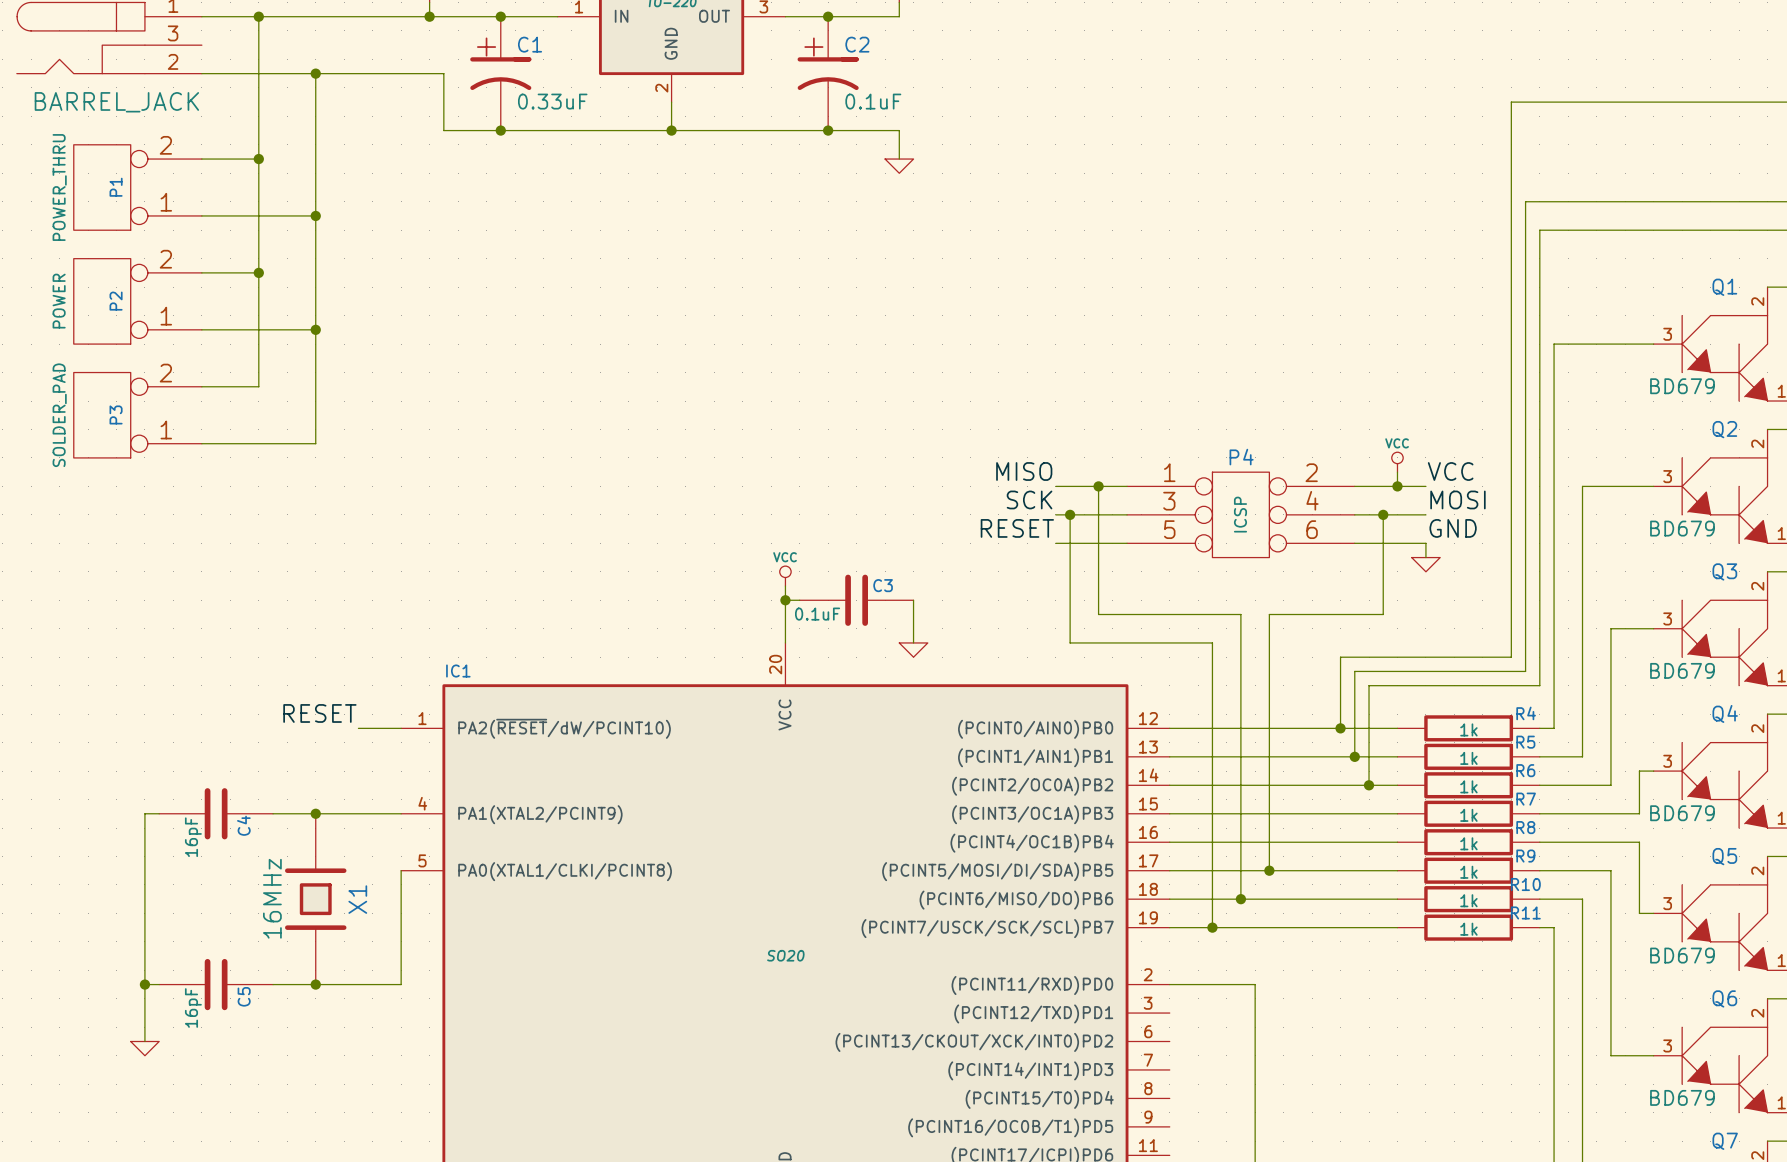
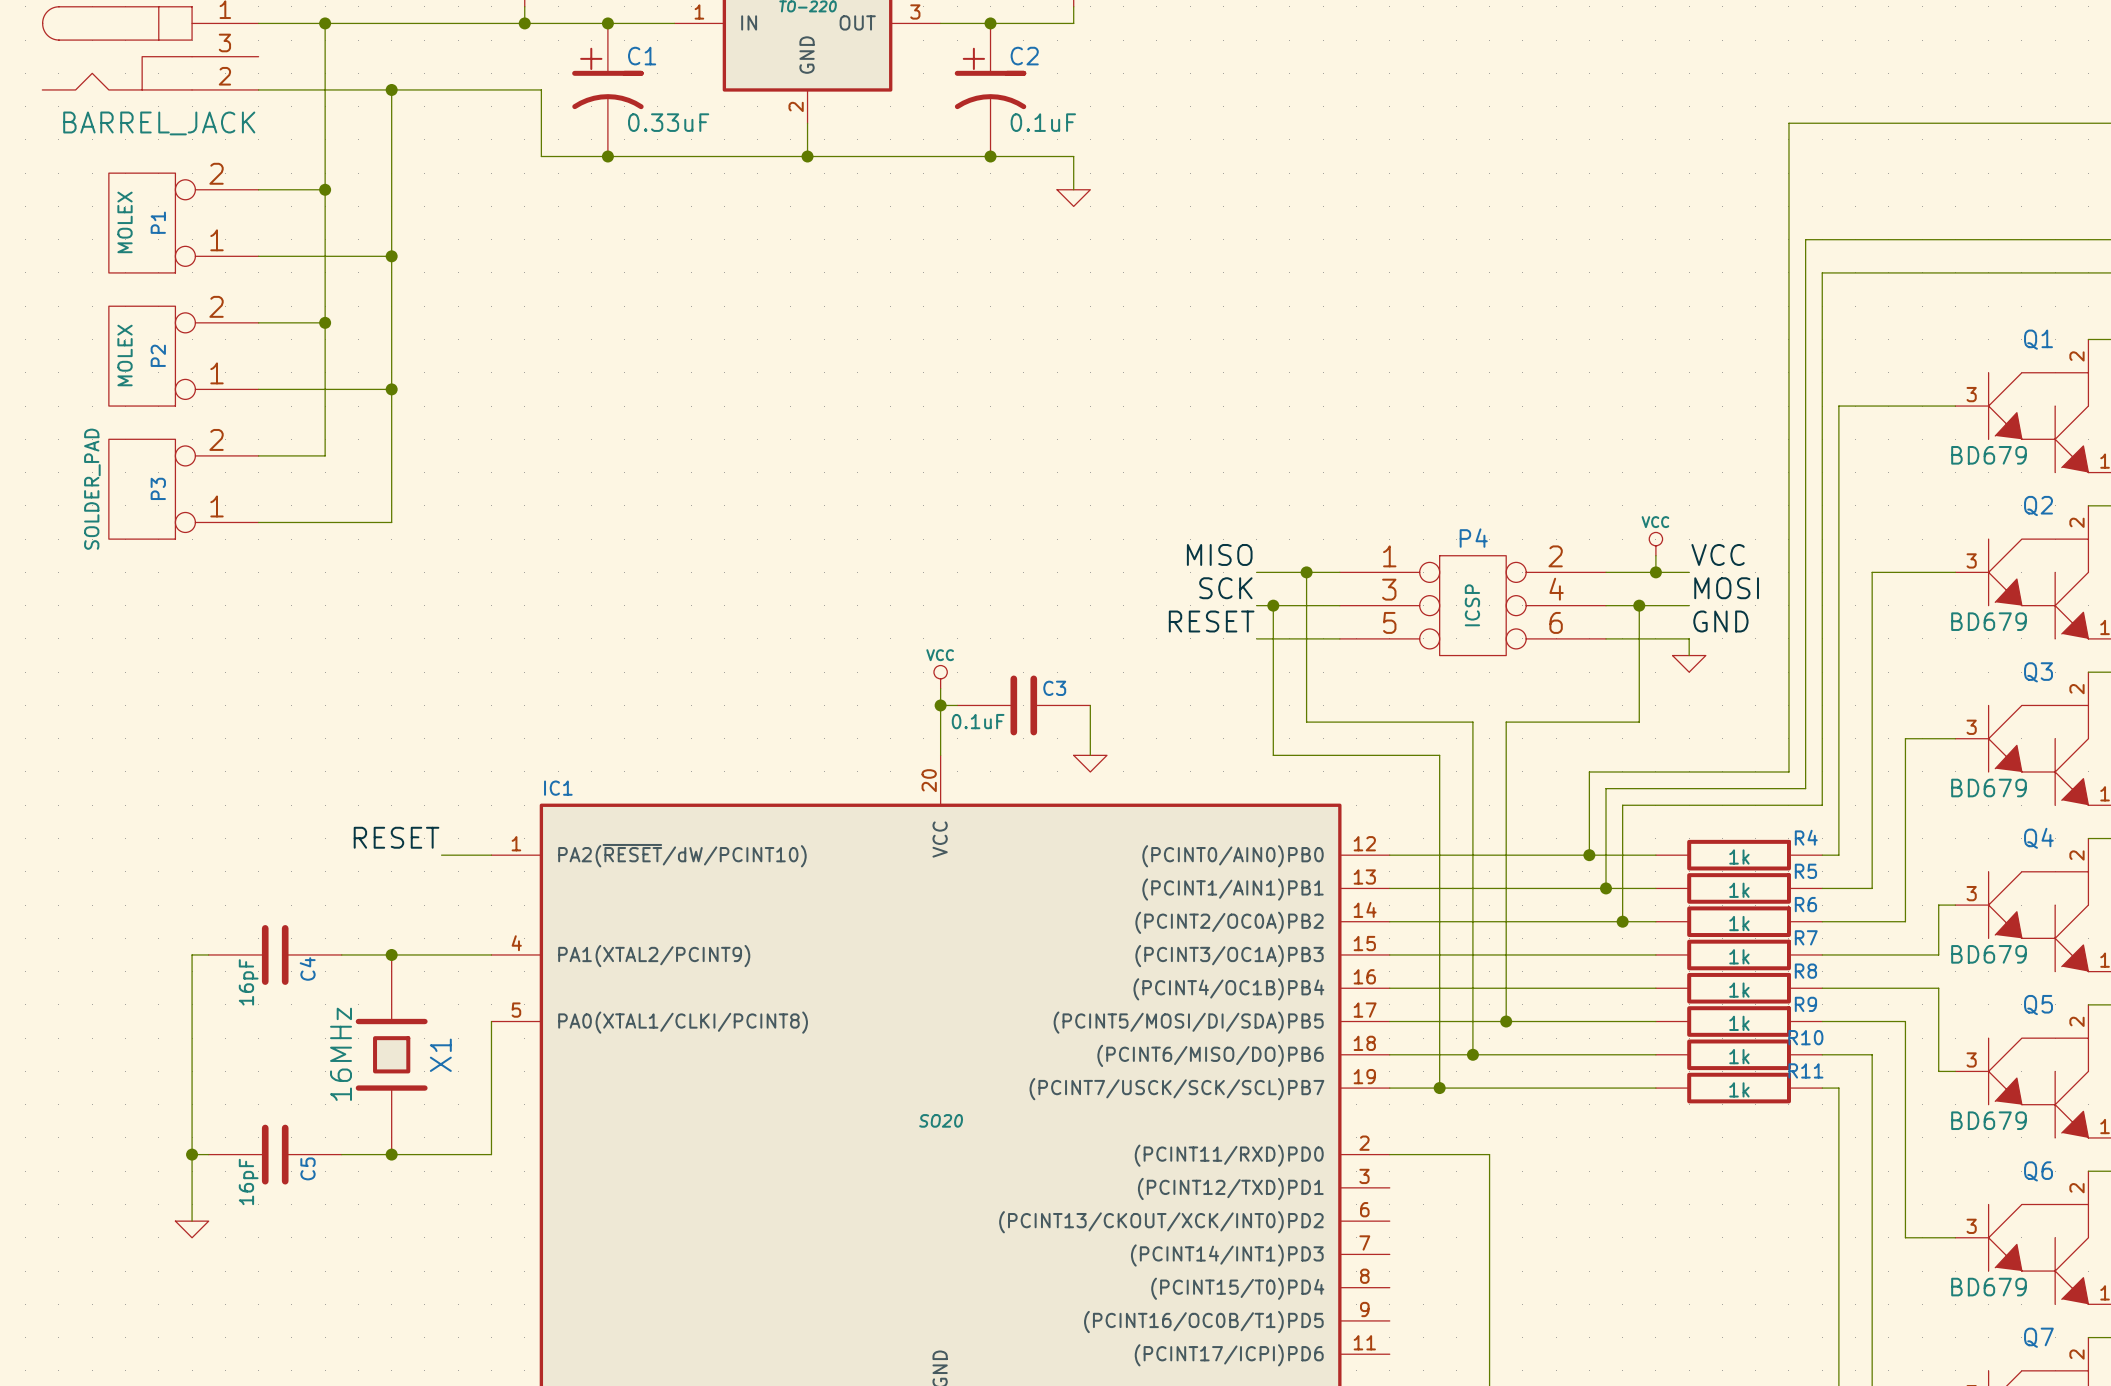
P1 value: POWER_THRU (59, 187) -> MOLEX (125, 222)
P2 value: POWER (59, 301) -> MOLEX (125, 355)

